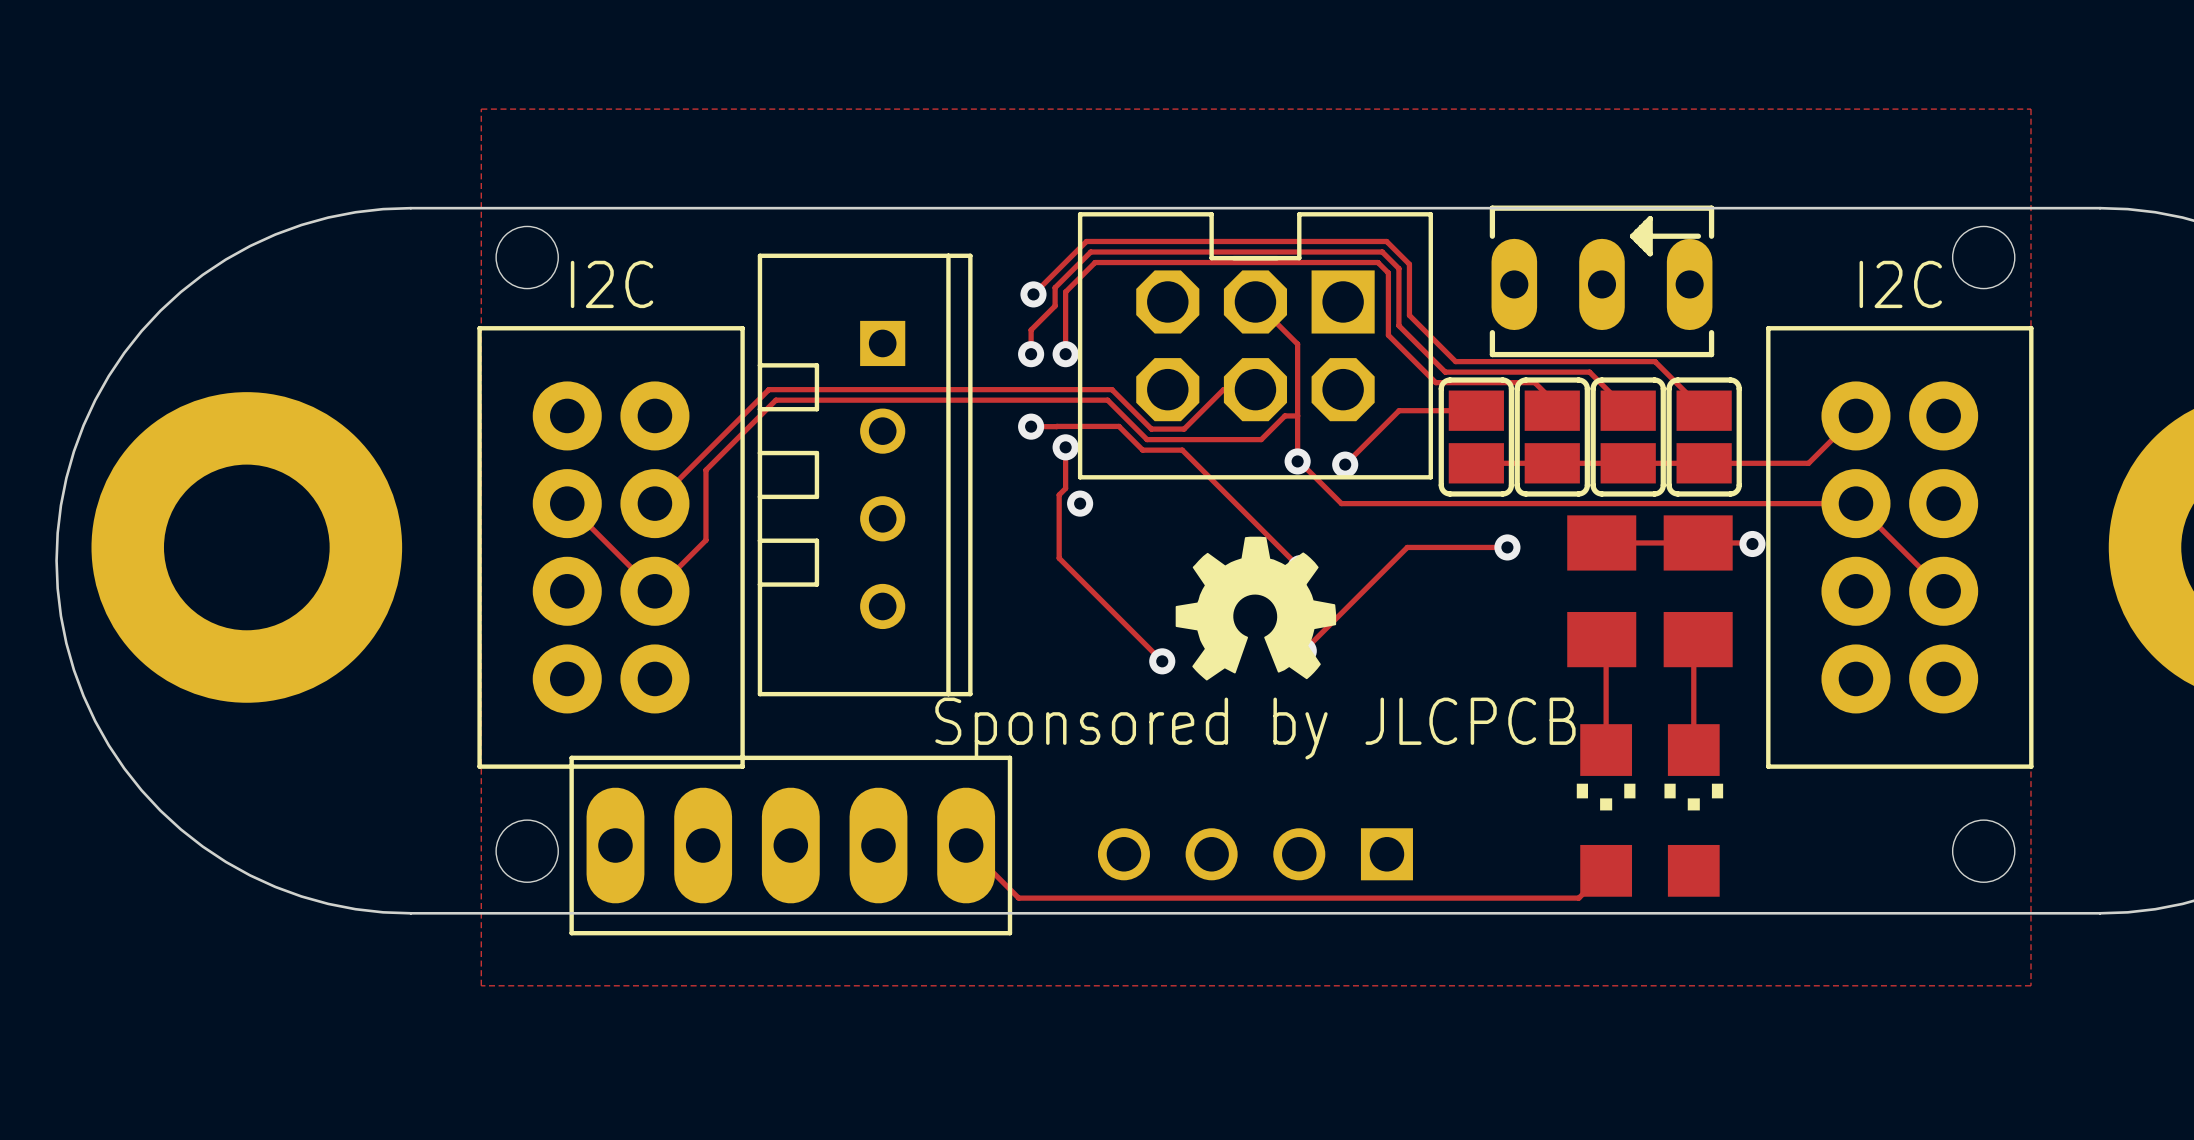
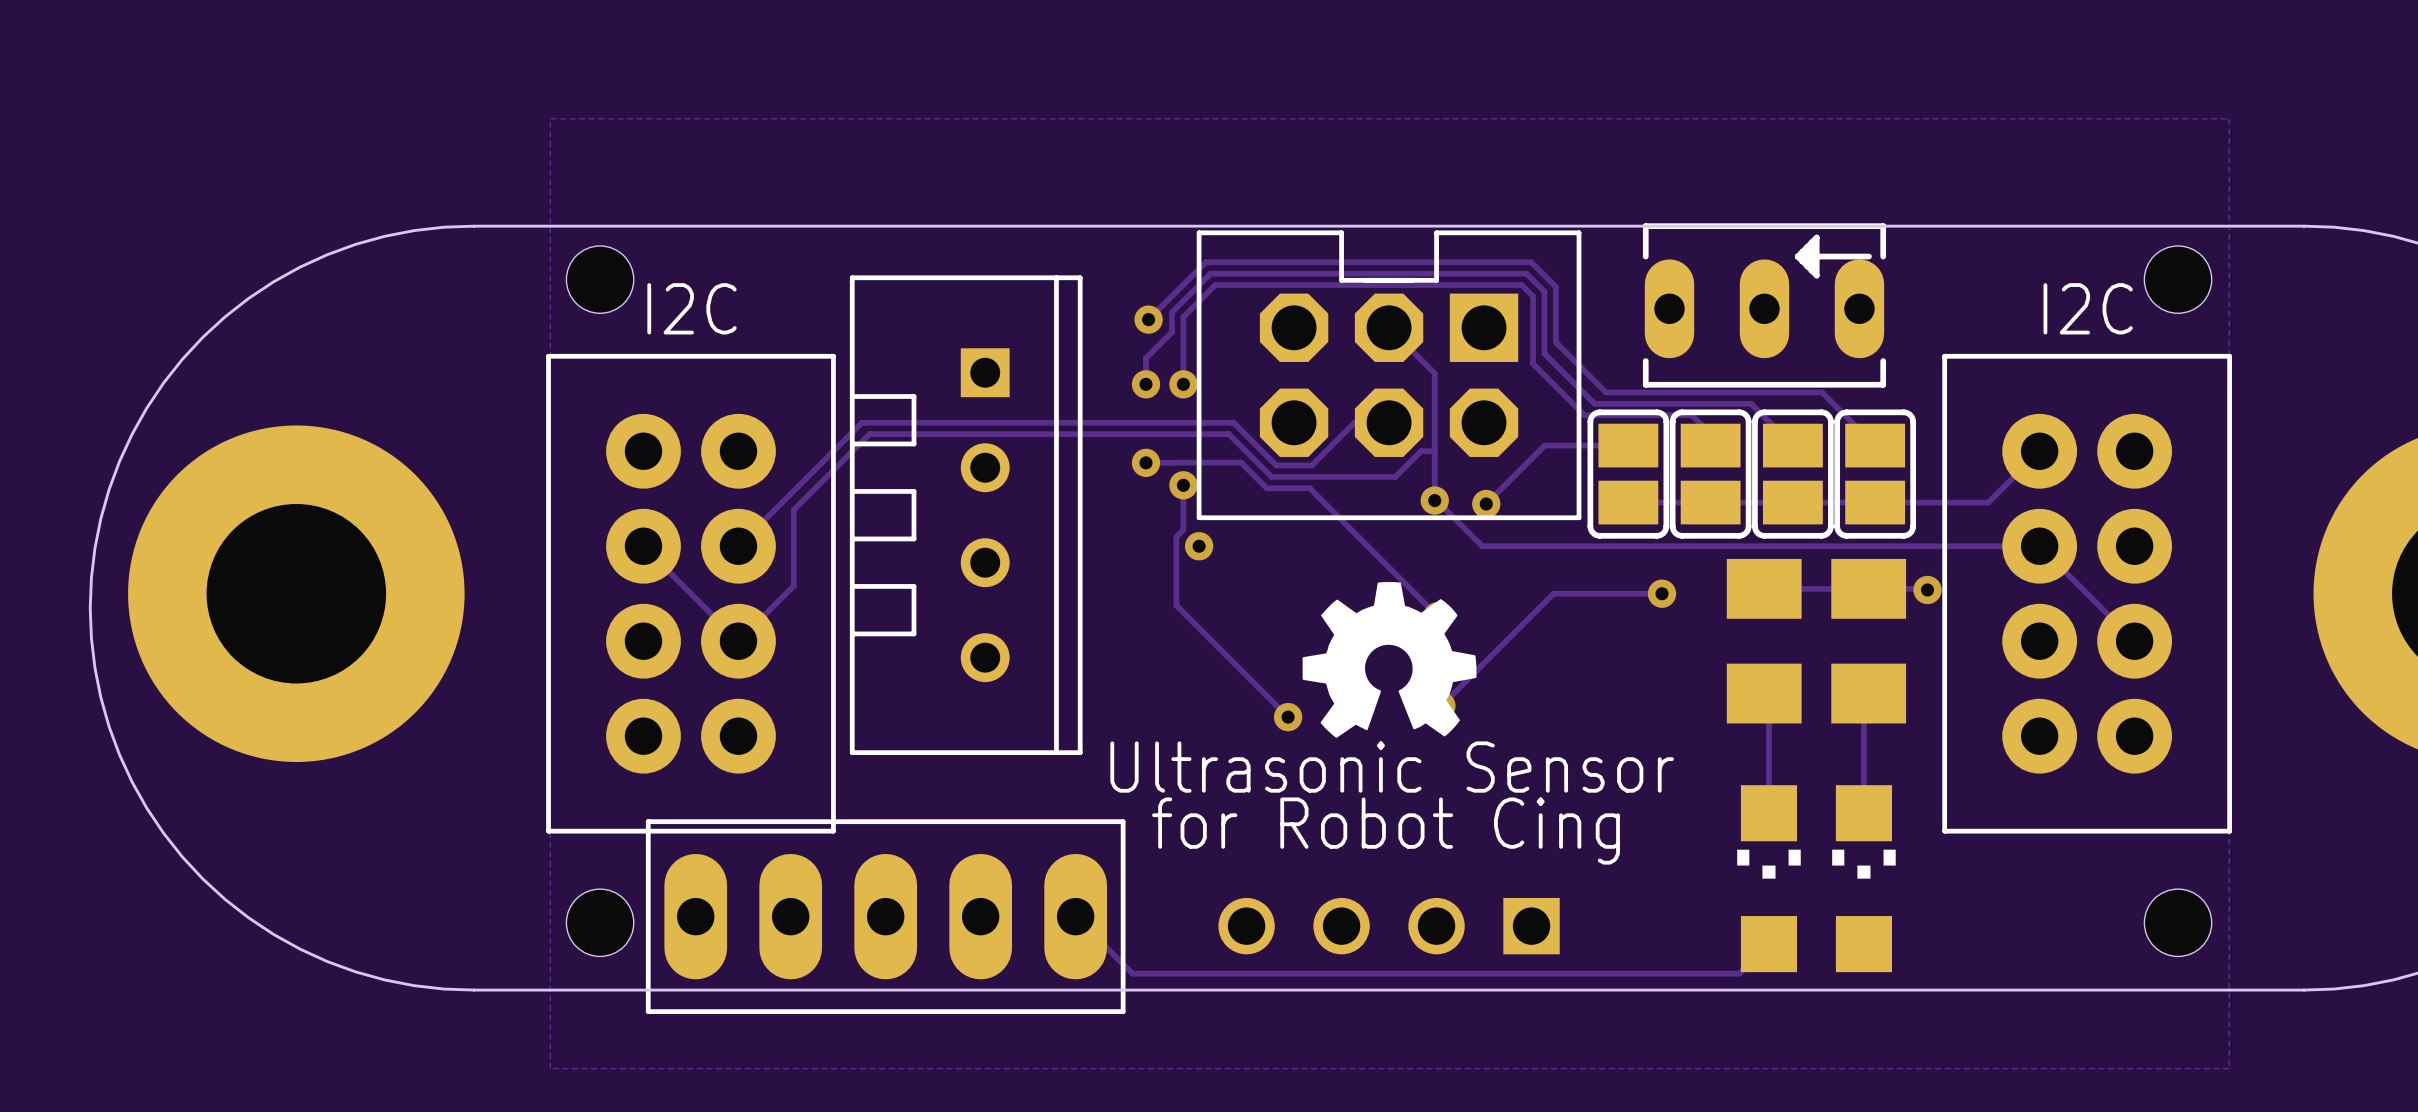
text: Sponsored by JLCPCB (1255, 728) -> Ultrasonic Sensor (1392, 767)
text: none -> for Robot Cing (1386, 831)

